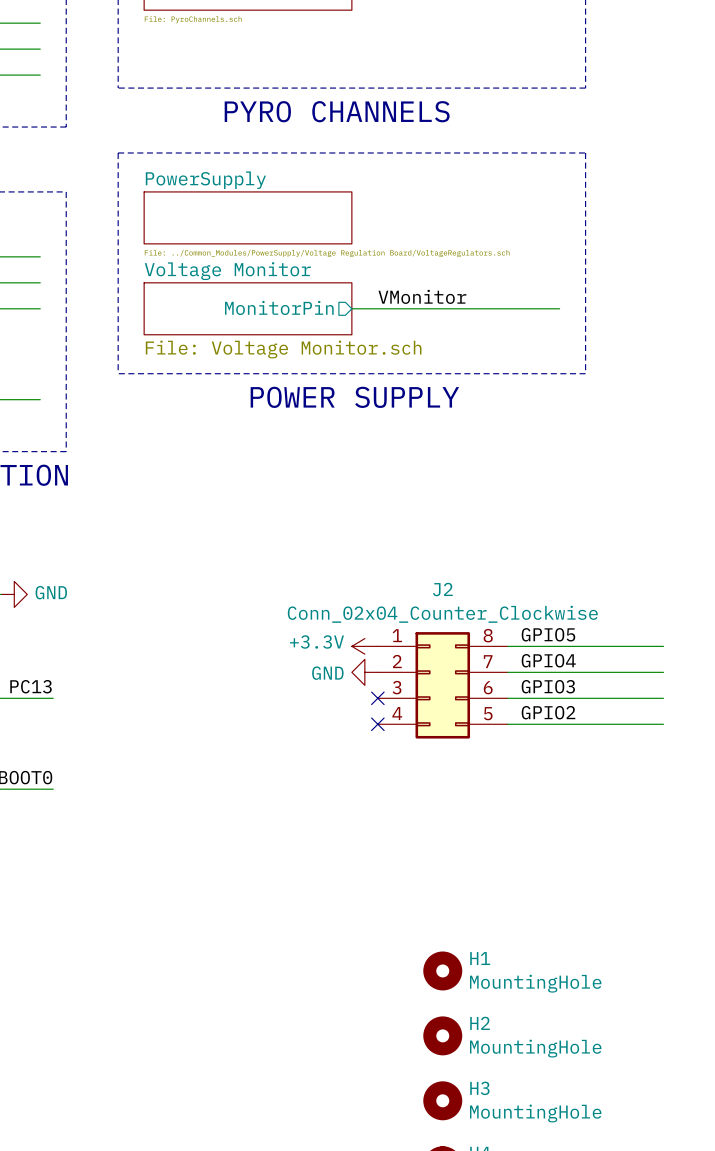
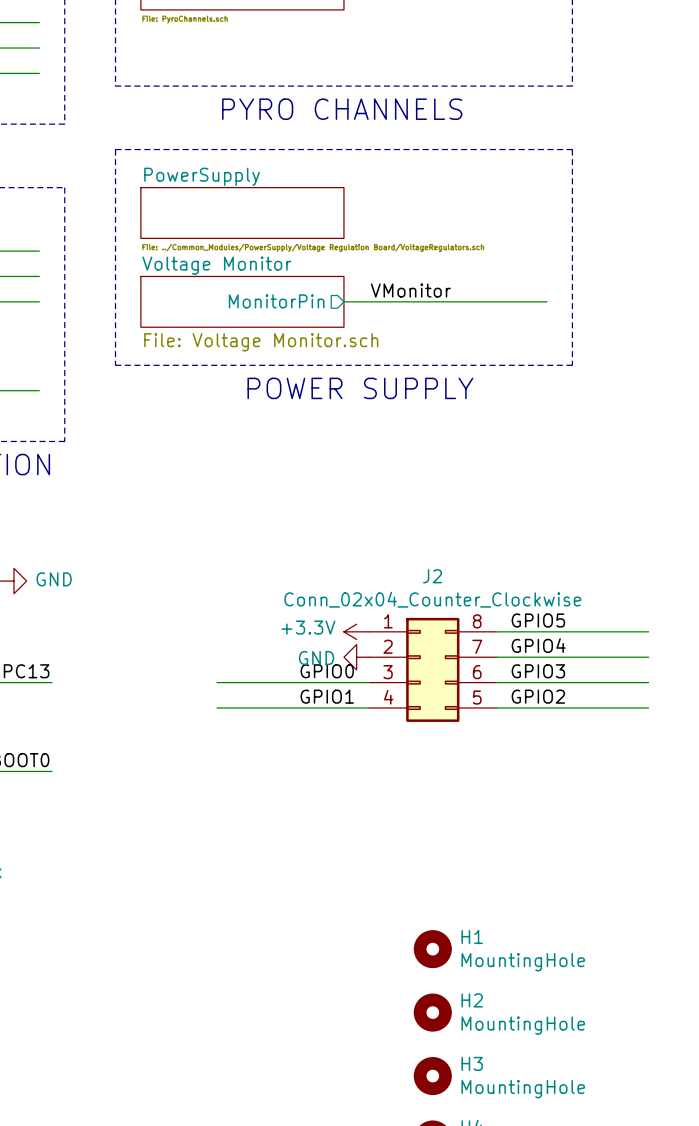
label: none -> GPIO0 (327, 671)
wire: none -> (217, 682) (369, 682)
no-connect mark: (377, 698) -> none
label: none -> GPIO1 (327, 696)
wire: none -> (217, 707) (369, 707)
no-connect mark: (377, 724) -> none

